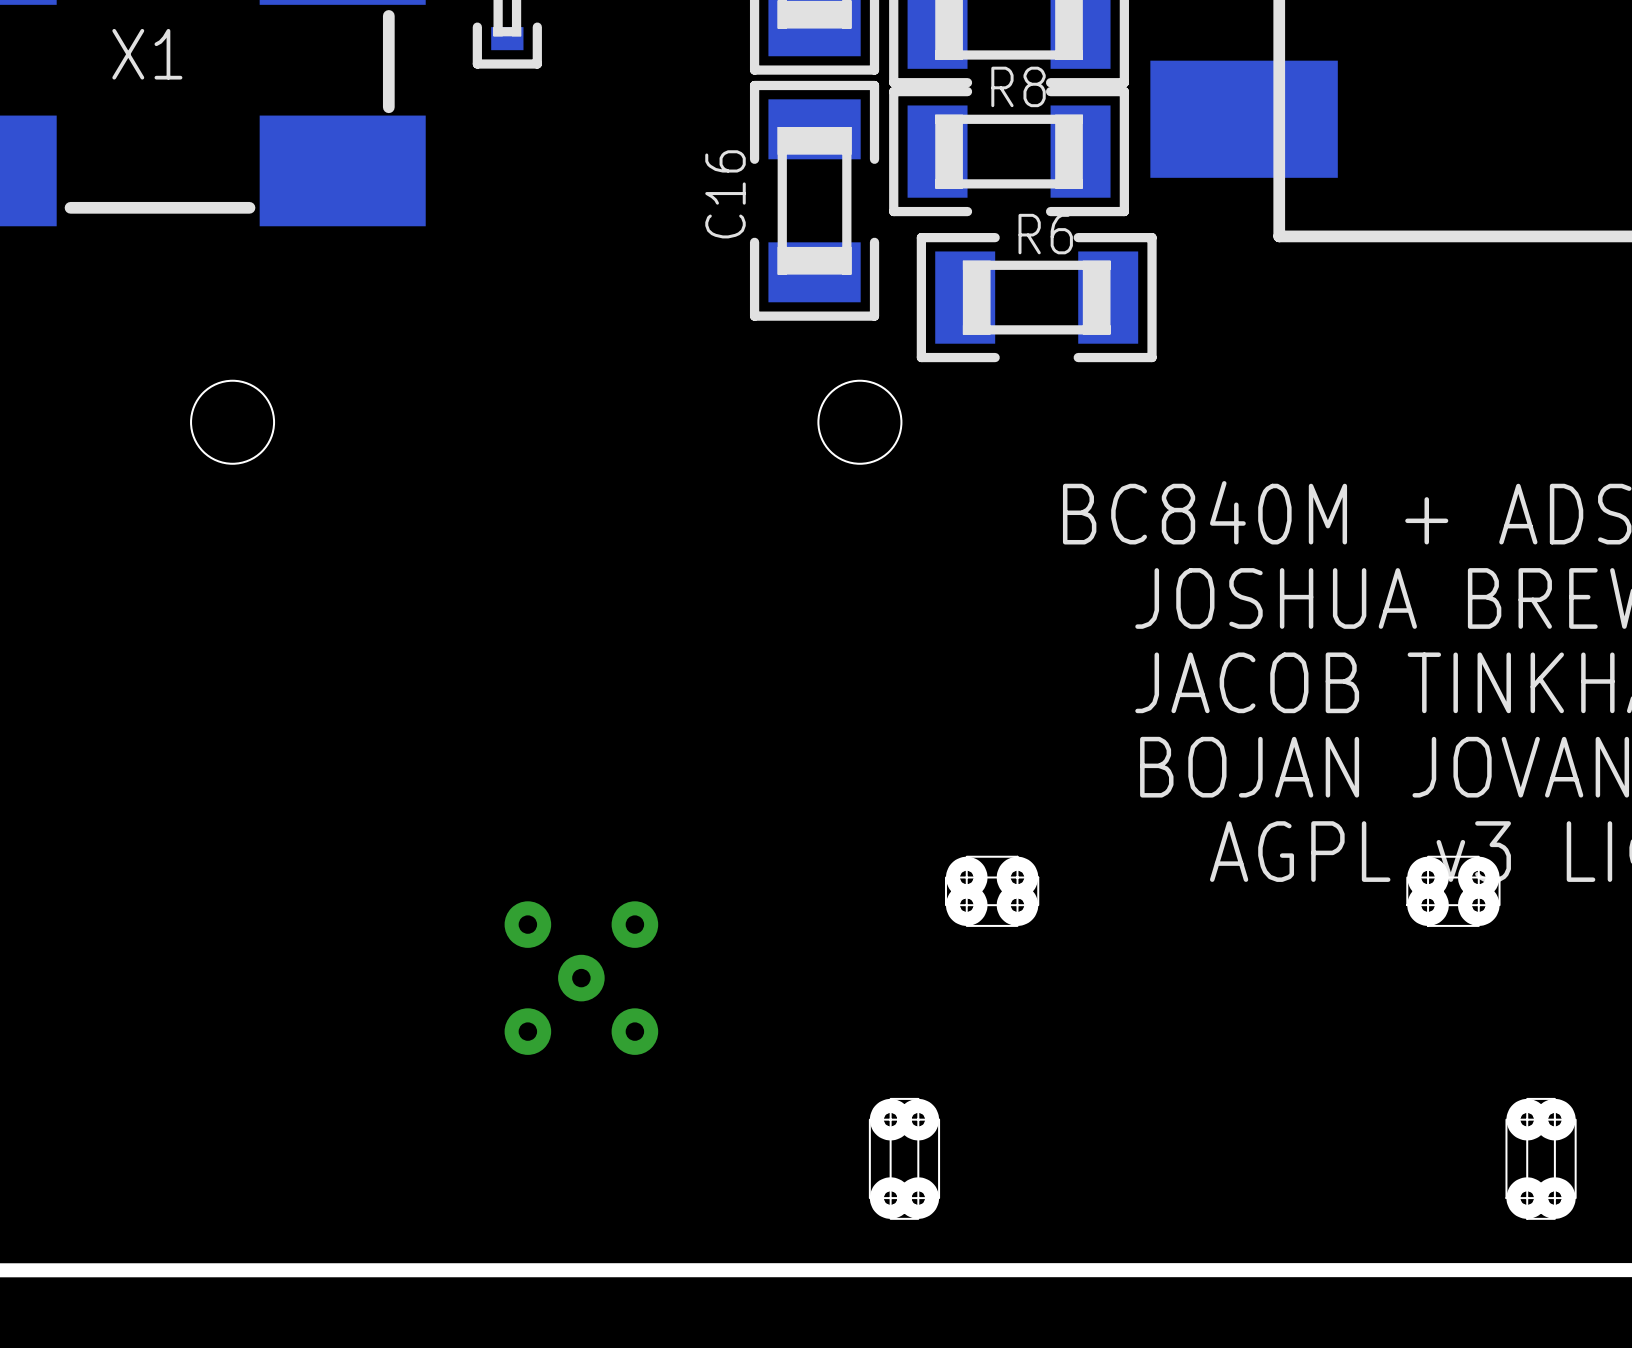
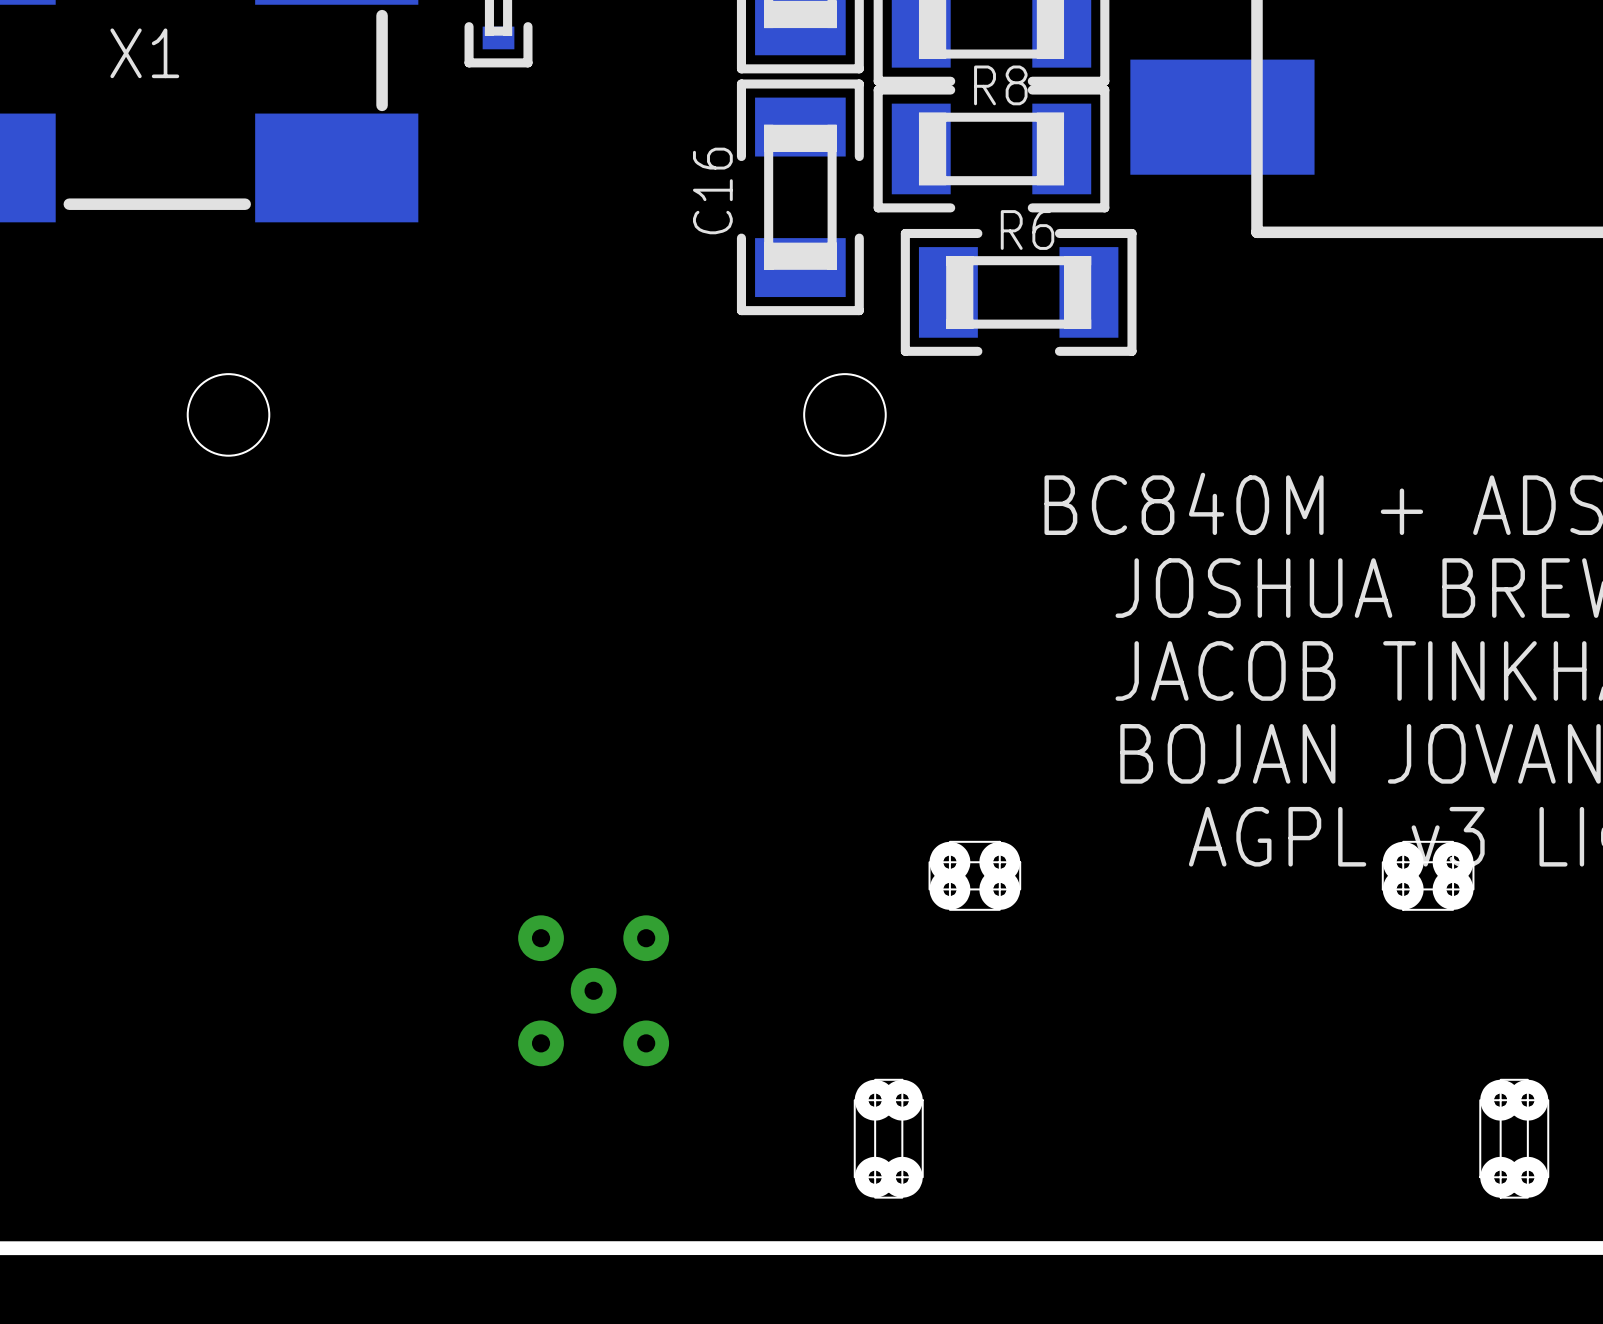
part position: (581, 978) -> (593, 990)

